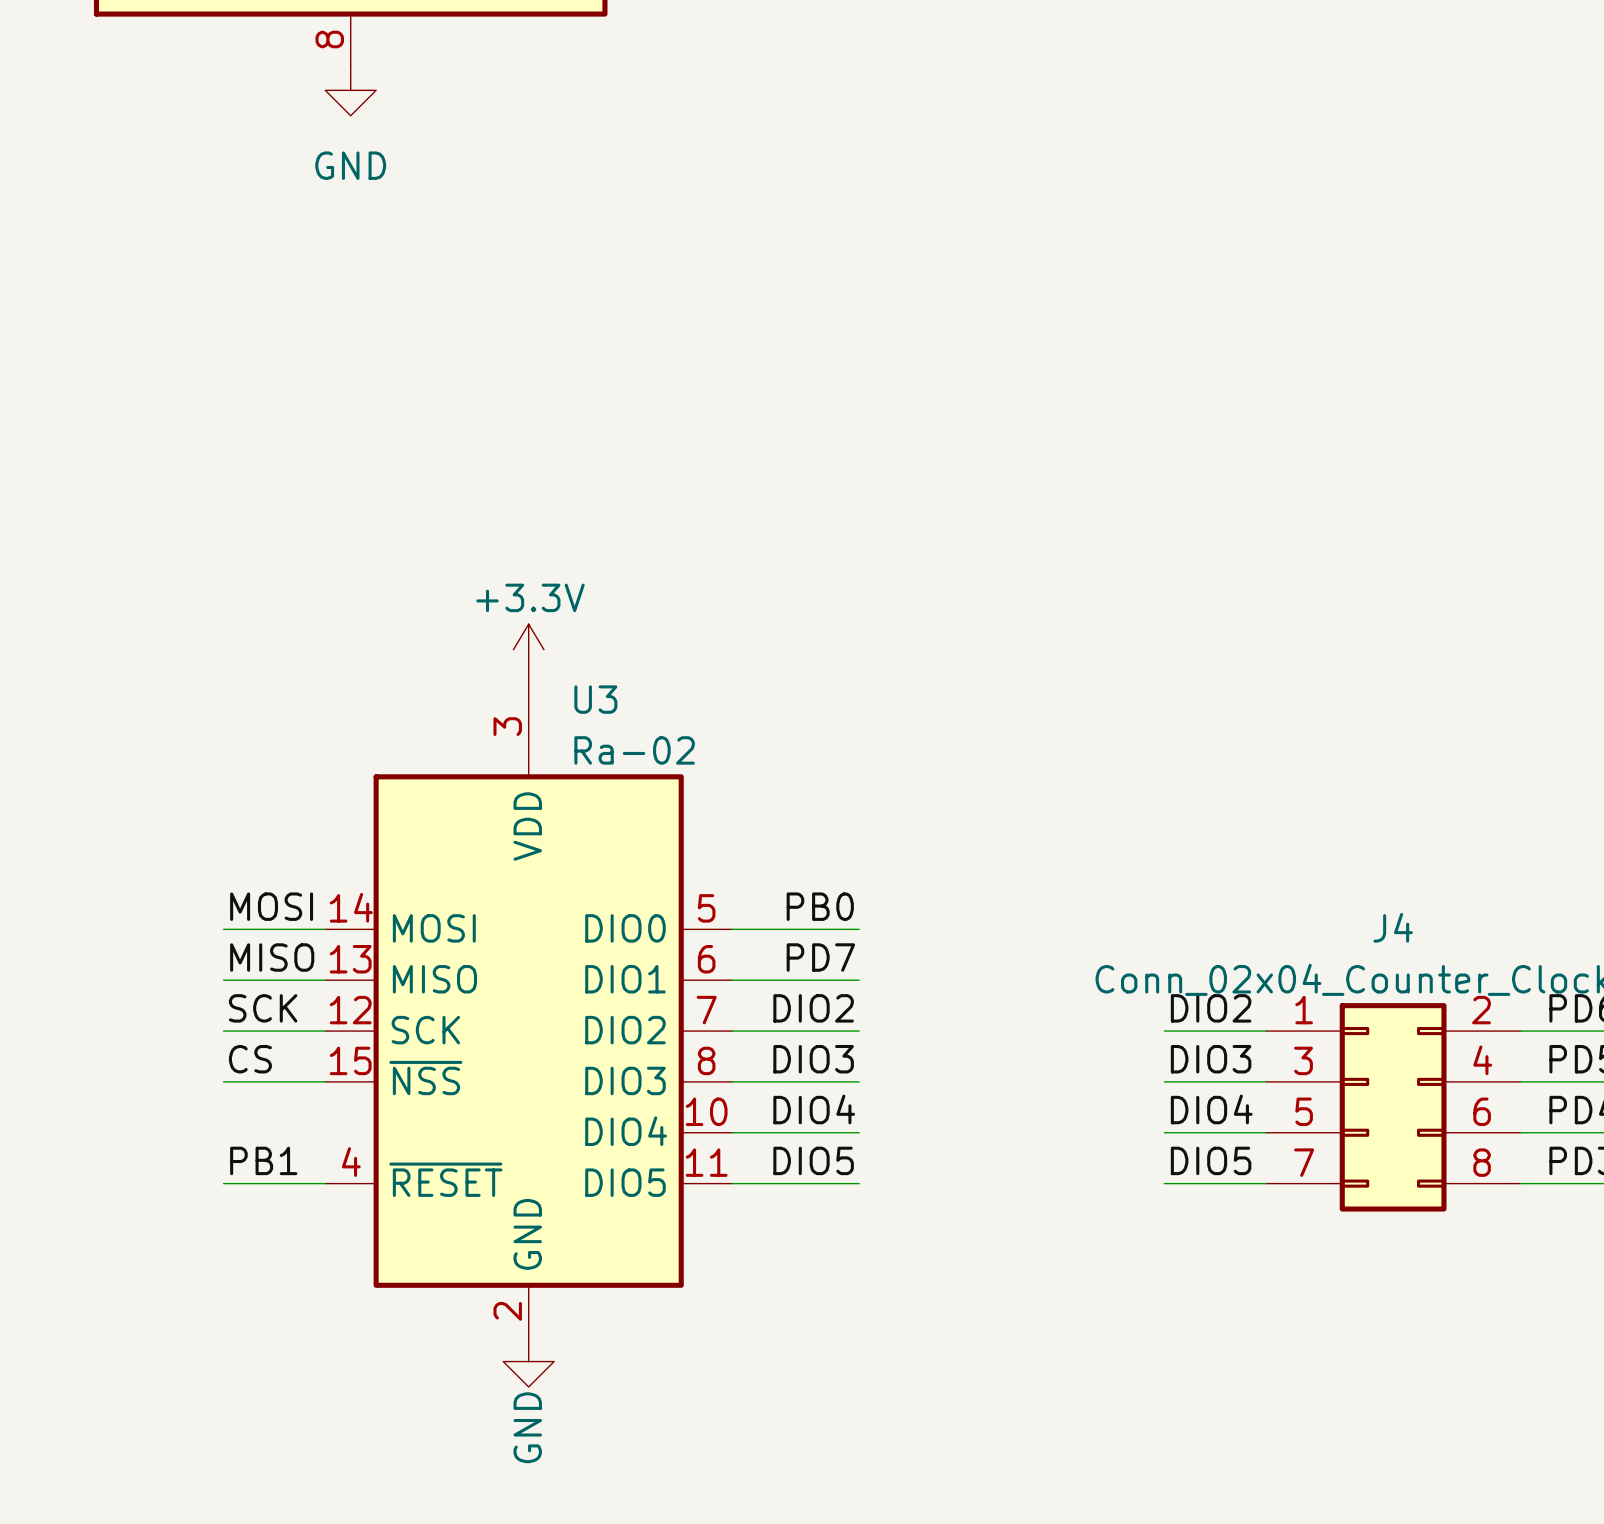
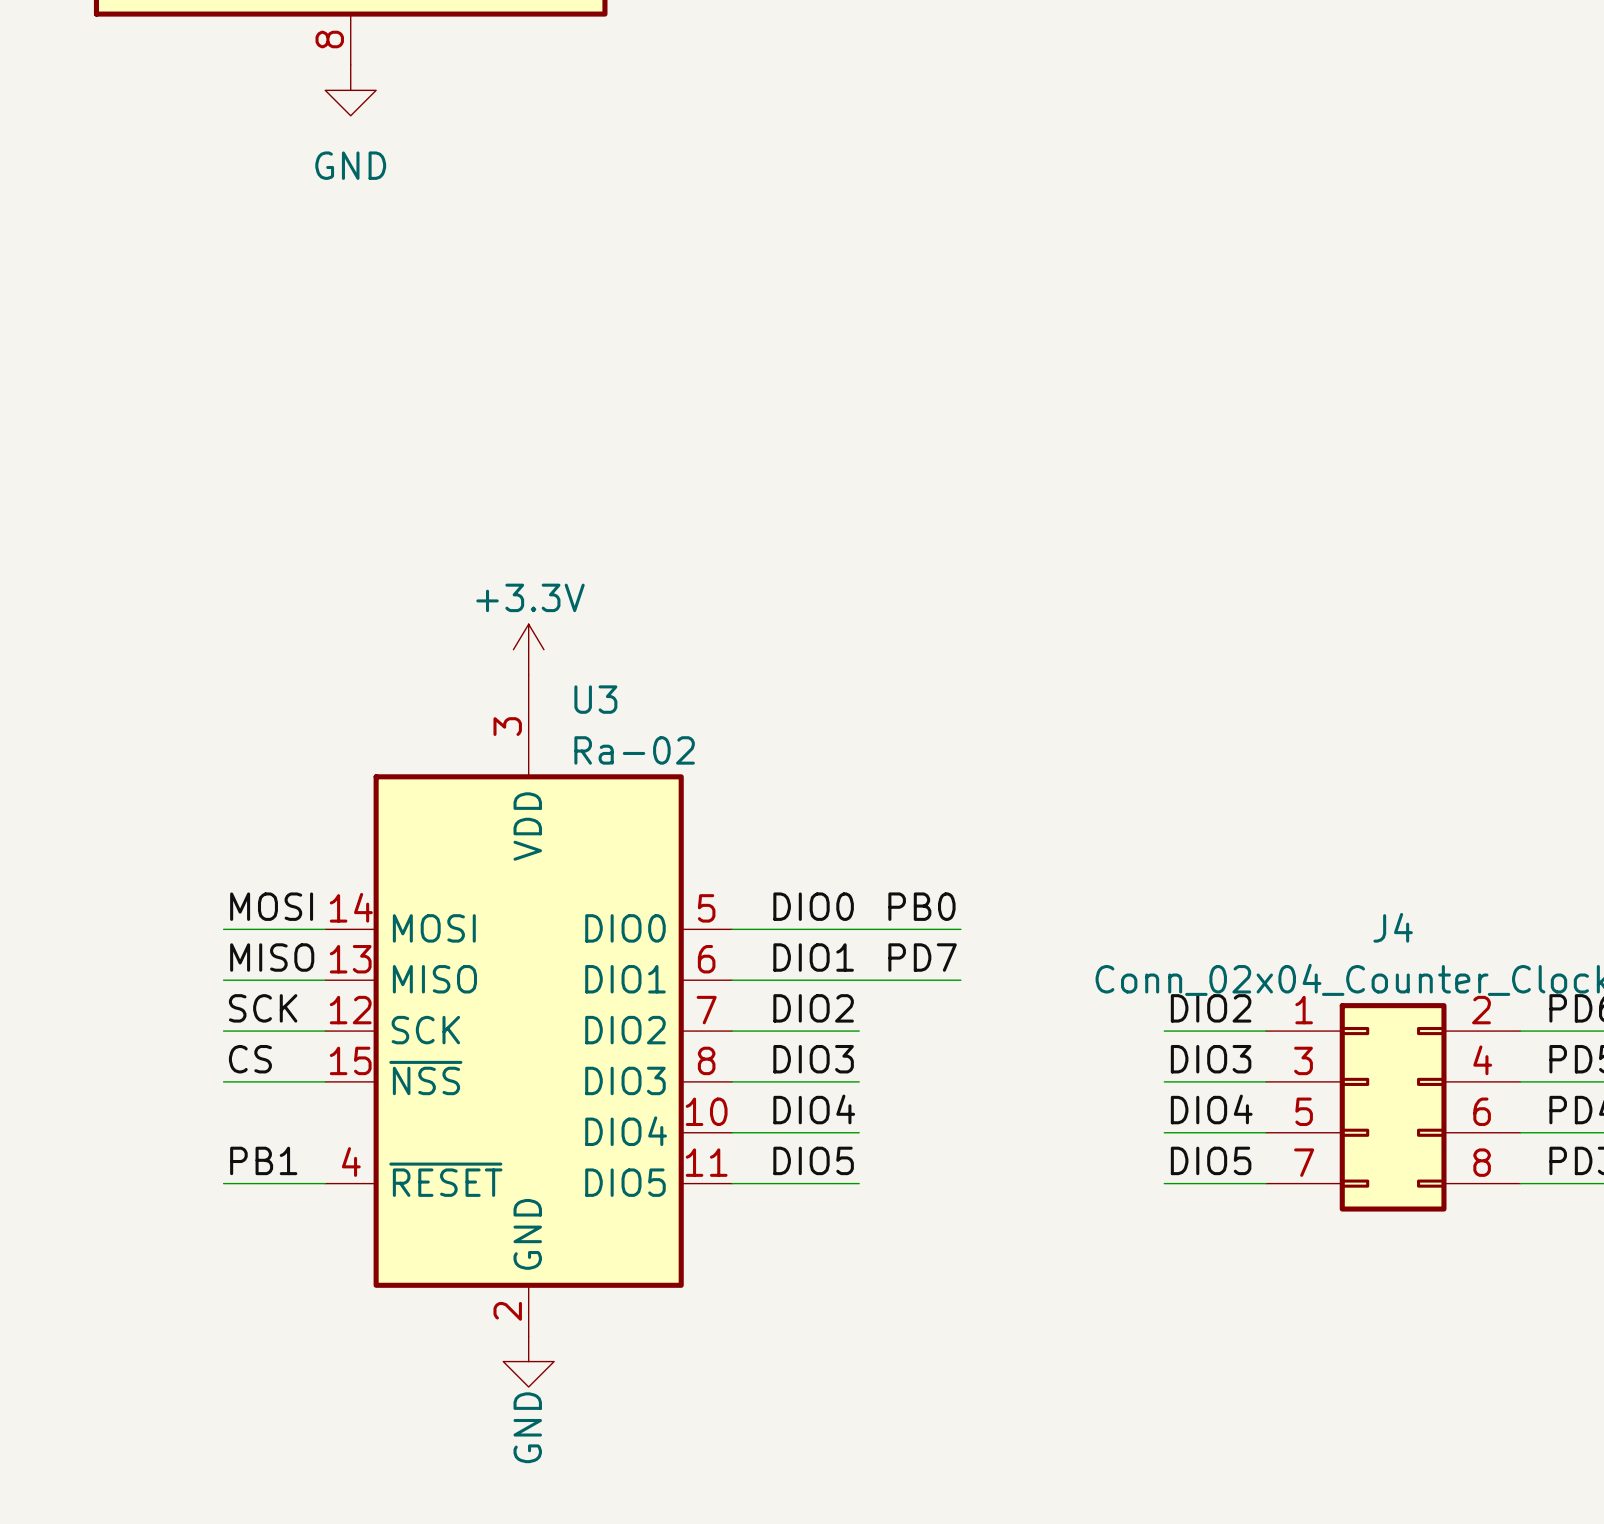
label: PB0 (820, 906) -> DIO0 (813, 906)
label: none -> PB0 (921, 906)
wire: none -> (859, 929) (960, 929)
label: PD7 (820, 957) -> DIO1 (813, 957)
label: none -> PD7 (922, 957)
wire: none -> (859, 980) (960, 980)

